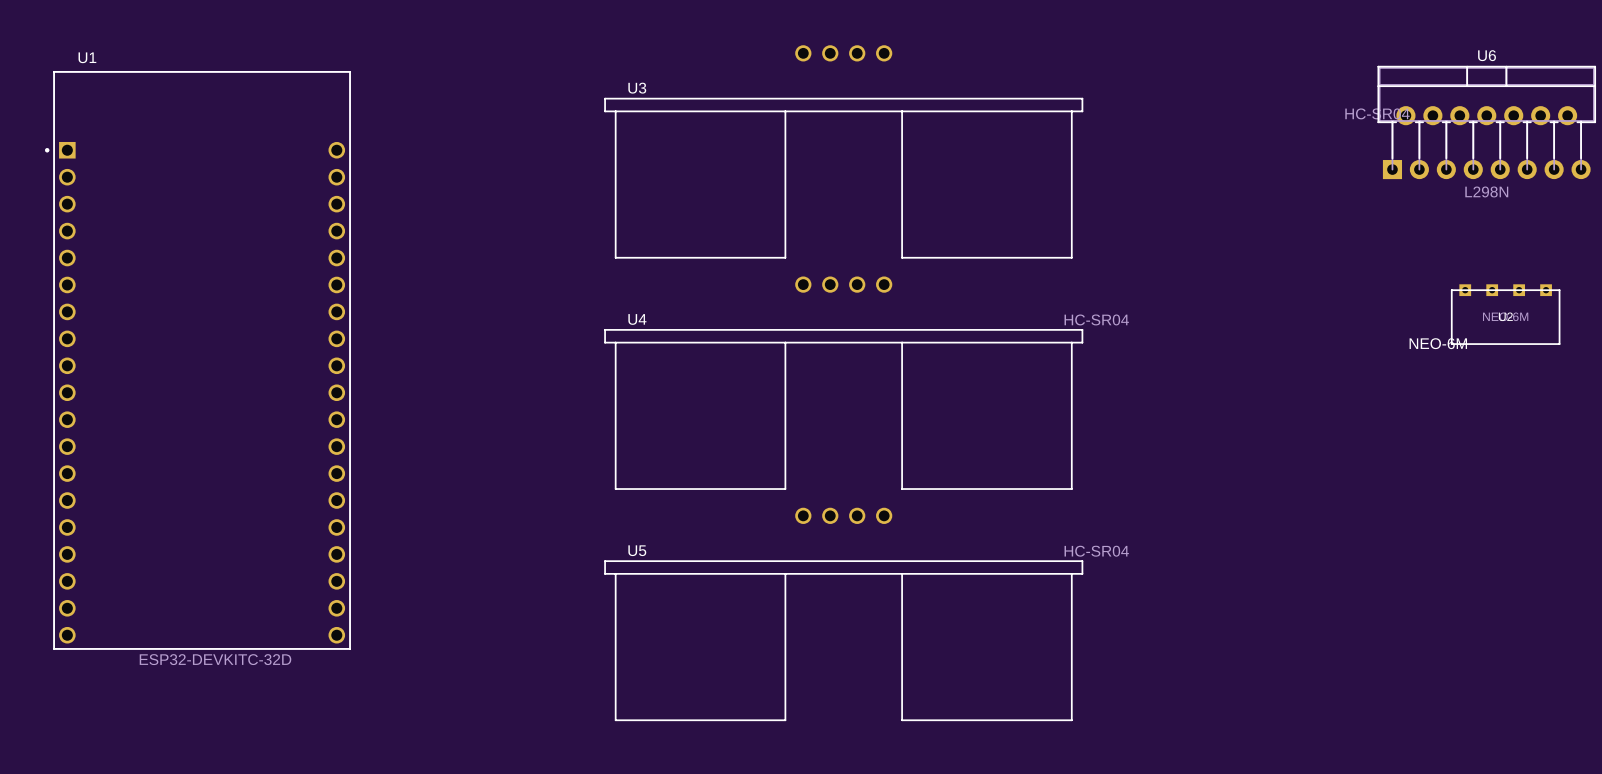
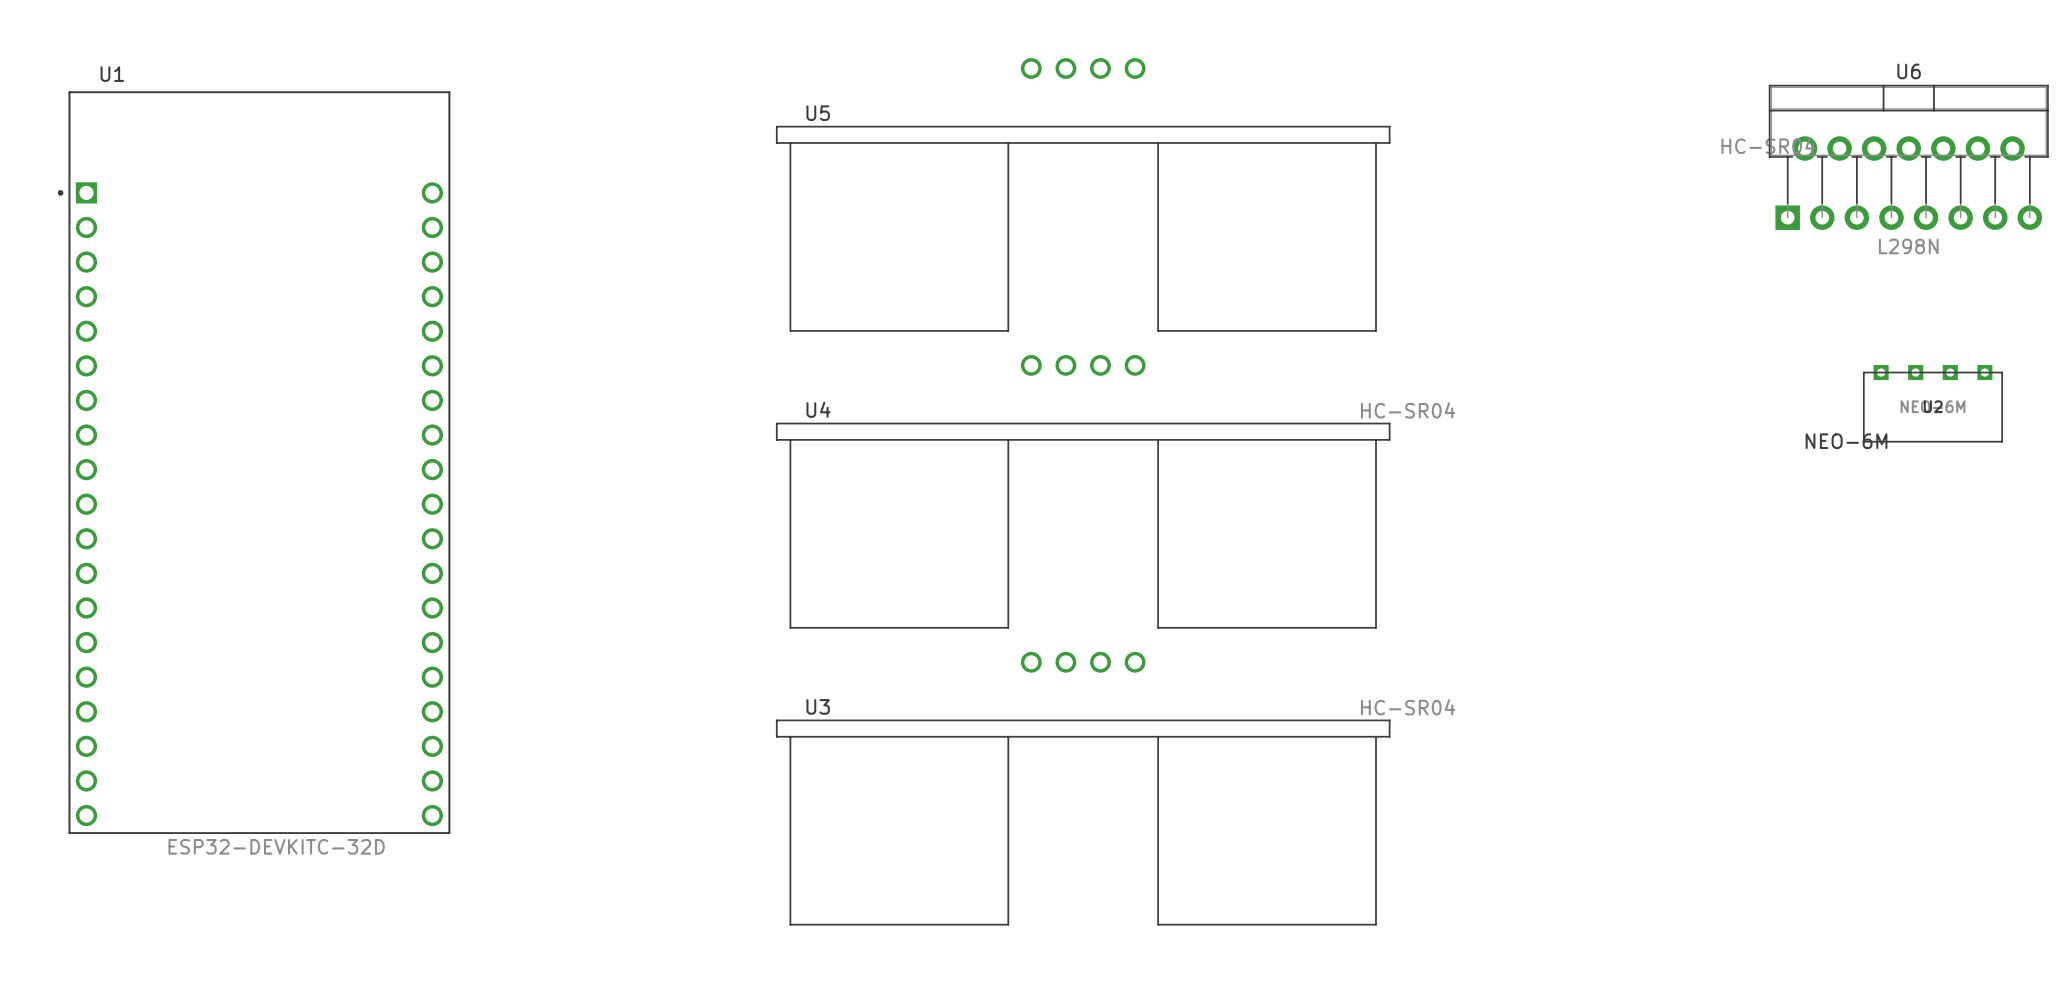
U3 name: U3 (637, 88) -> U5 (818, 113)
U5 name: U5 (637, 550) -> U3 (818, 706)

